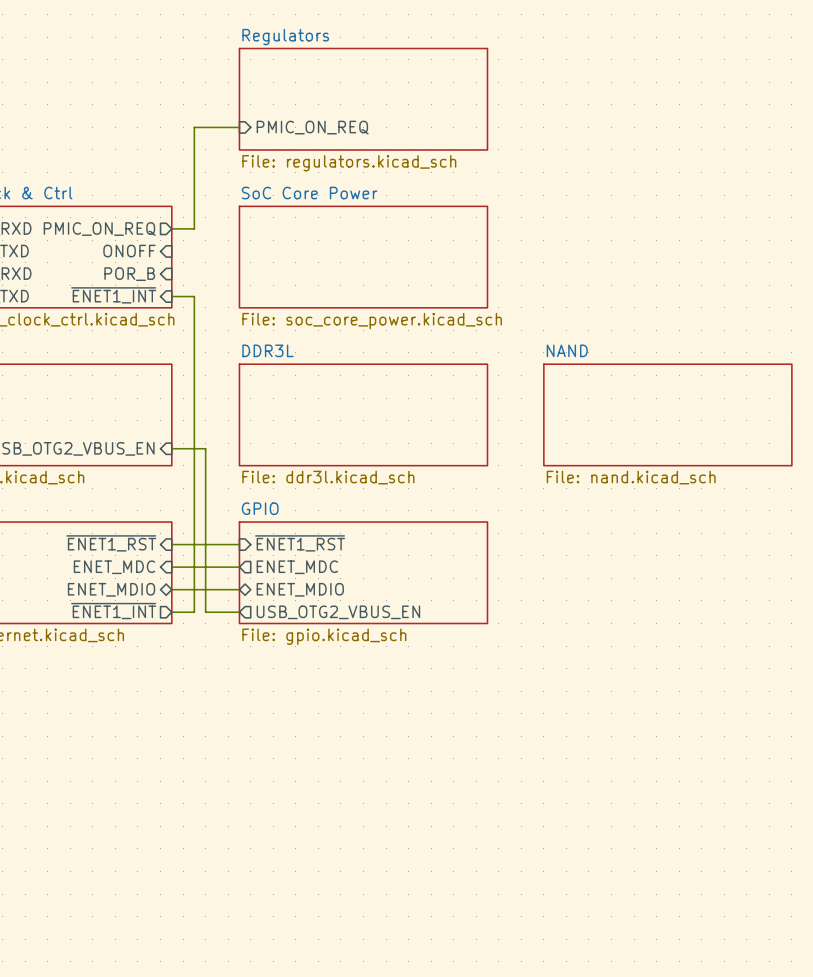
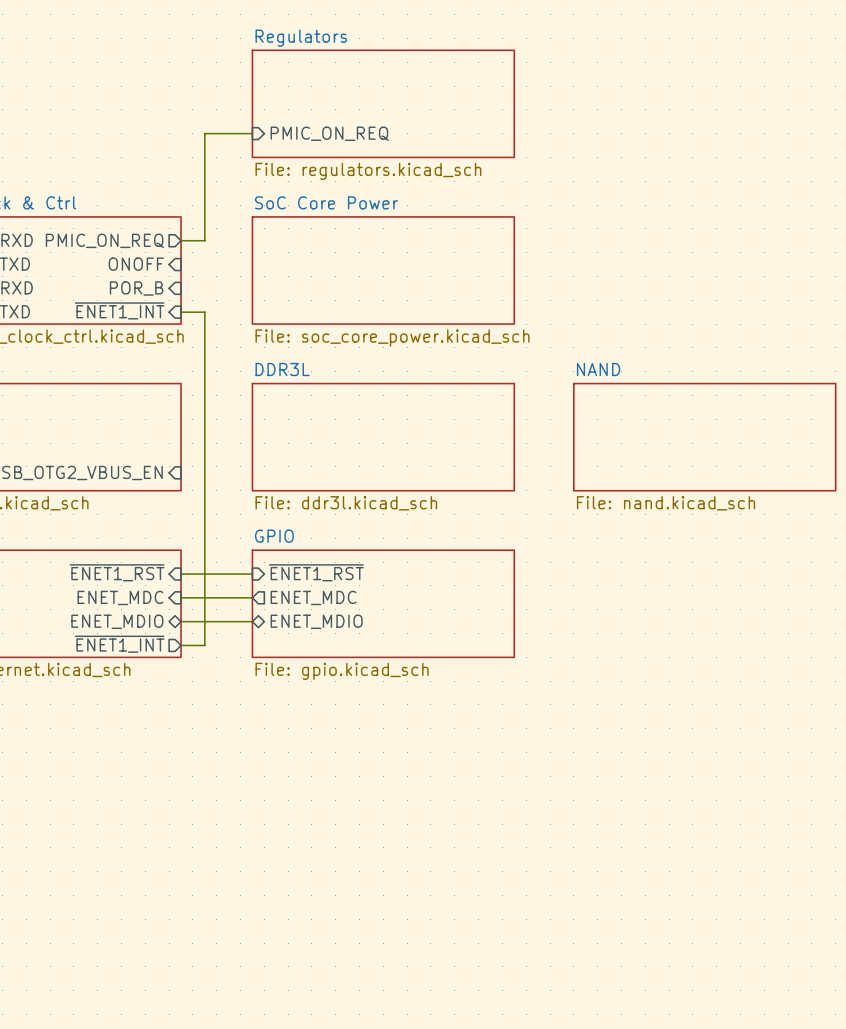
wire: (171, 448) (205, 448) (205, 612) (239, 612) -> none
sheet pin: USB_OTG2_VBUS_EN (338, 612) -> none

